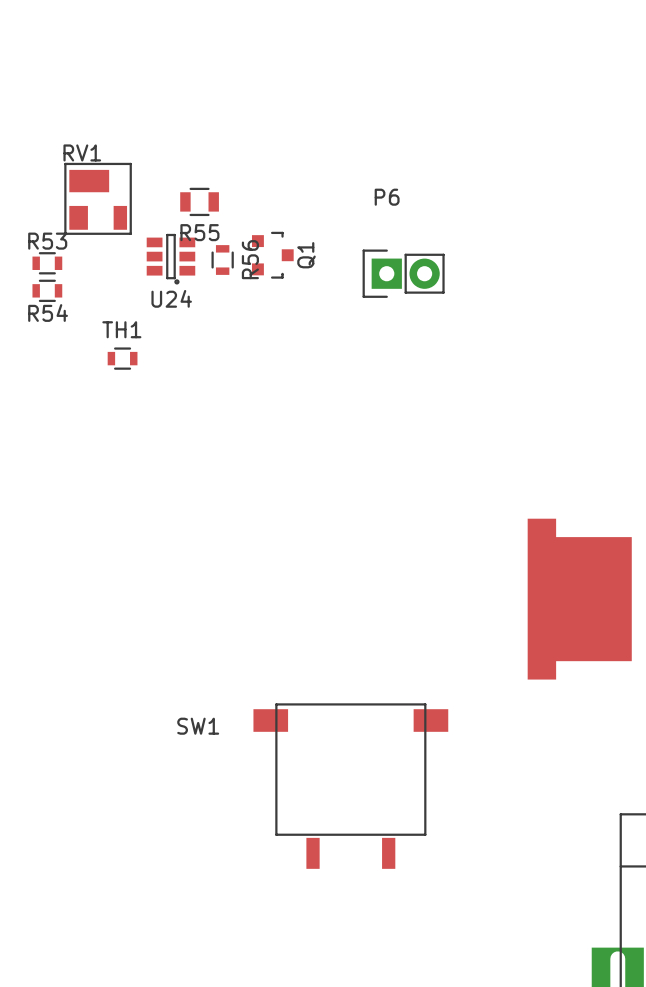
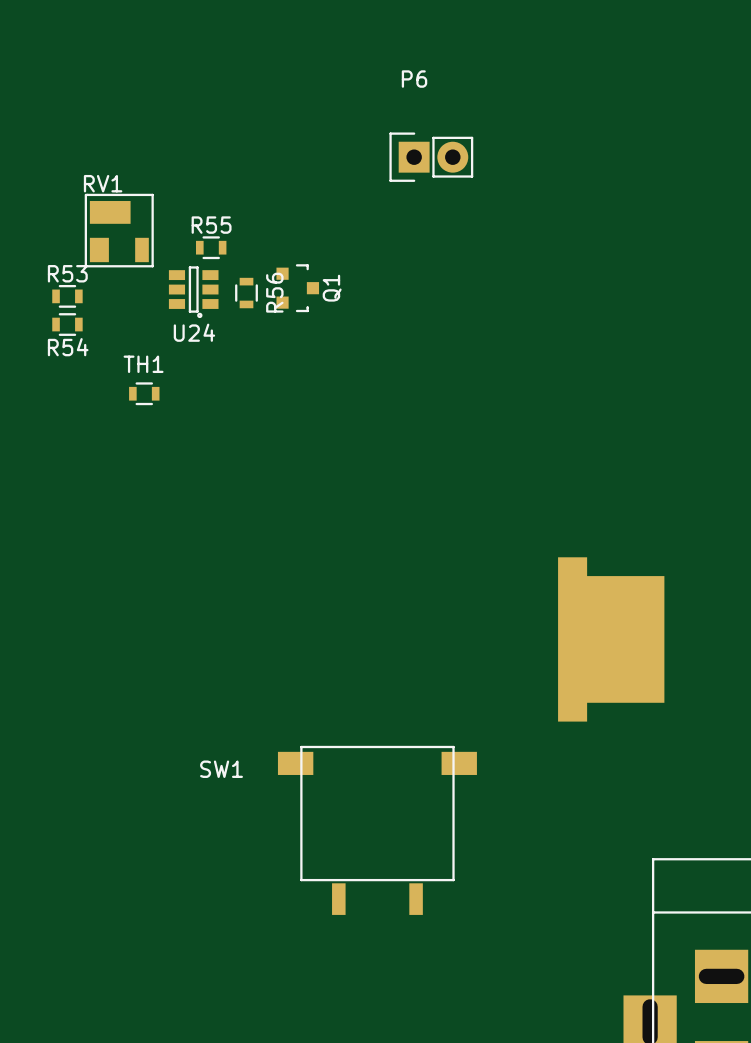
R55 footprint: [180, 187, 219, 217] -> [196, 236, 227, 260]
R55 name position: R55 (199, 232) -> R55 (211, 225)
P6 position: (403, 273) -> (431, 157)

